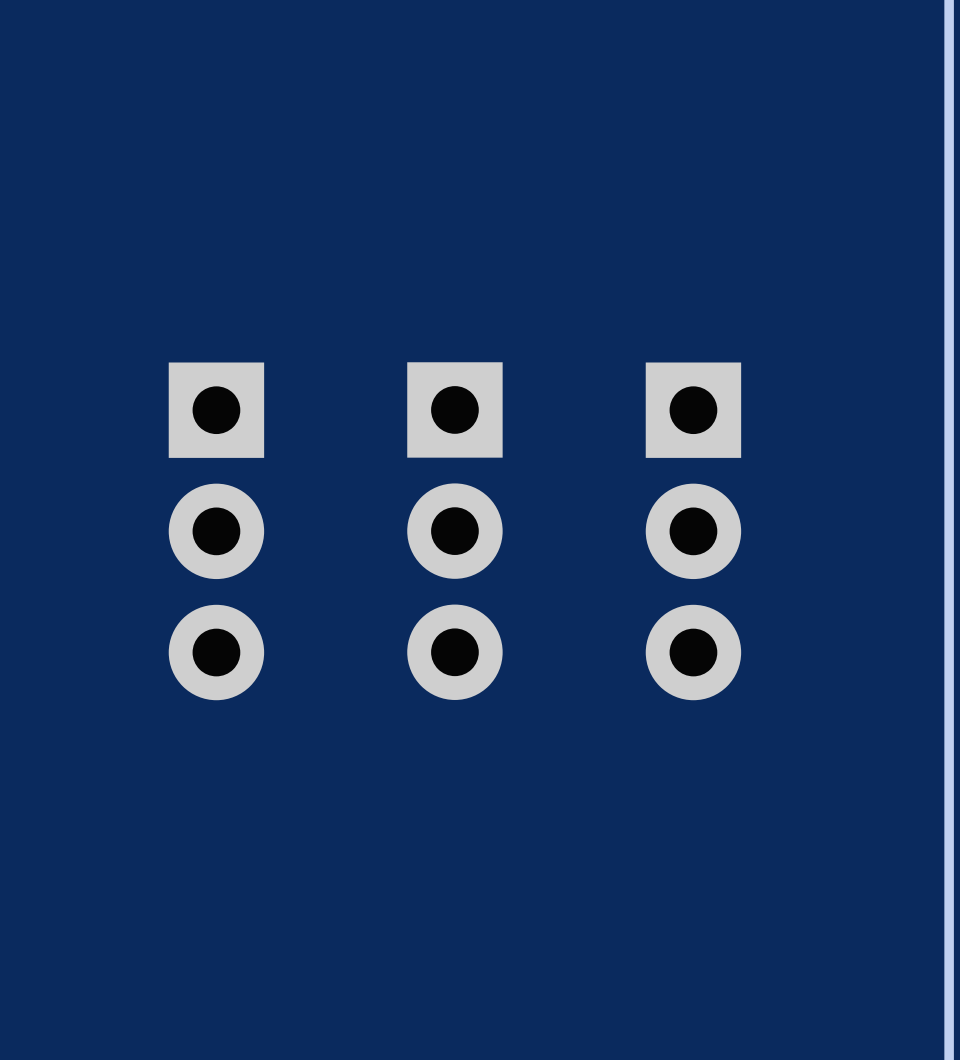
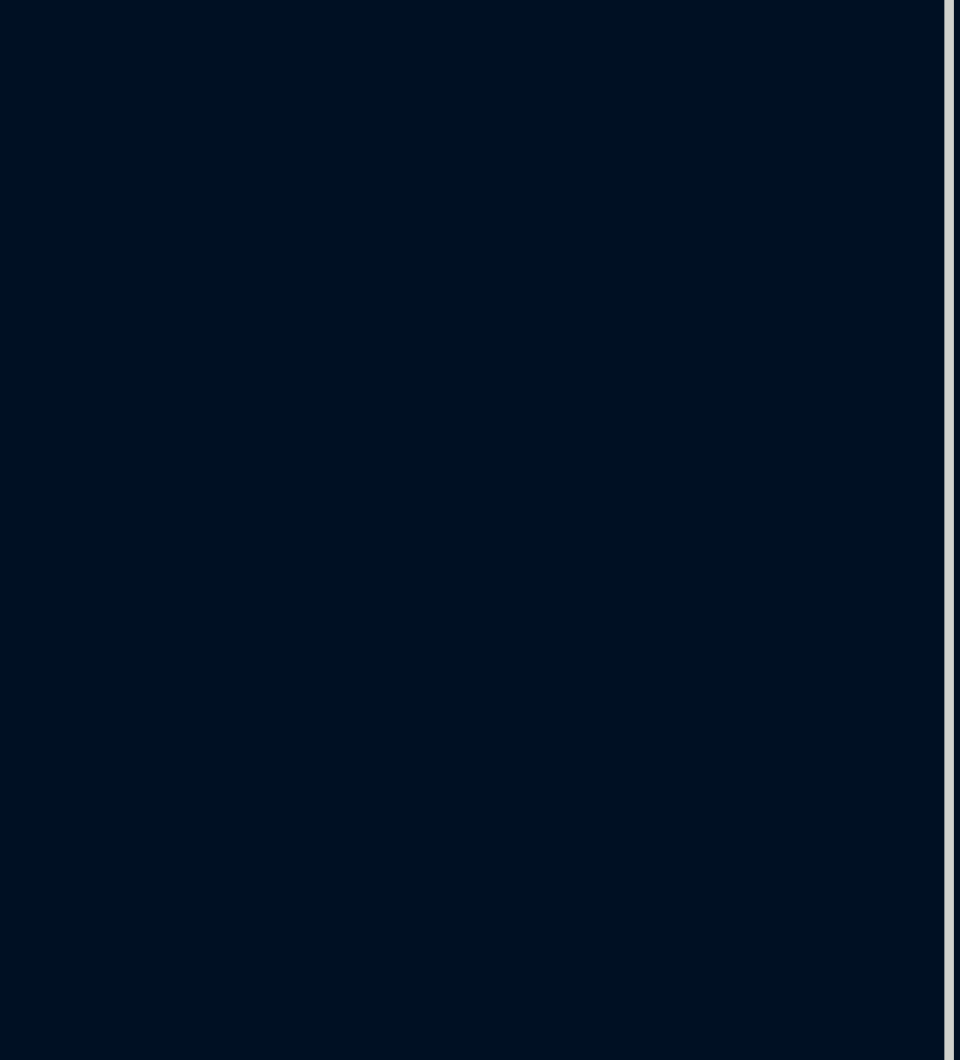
part: (216, 531) -> none
part: (454, 531) -> none
part: (693, 531) -> none

